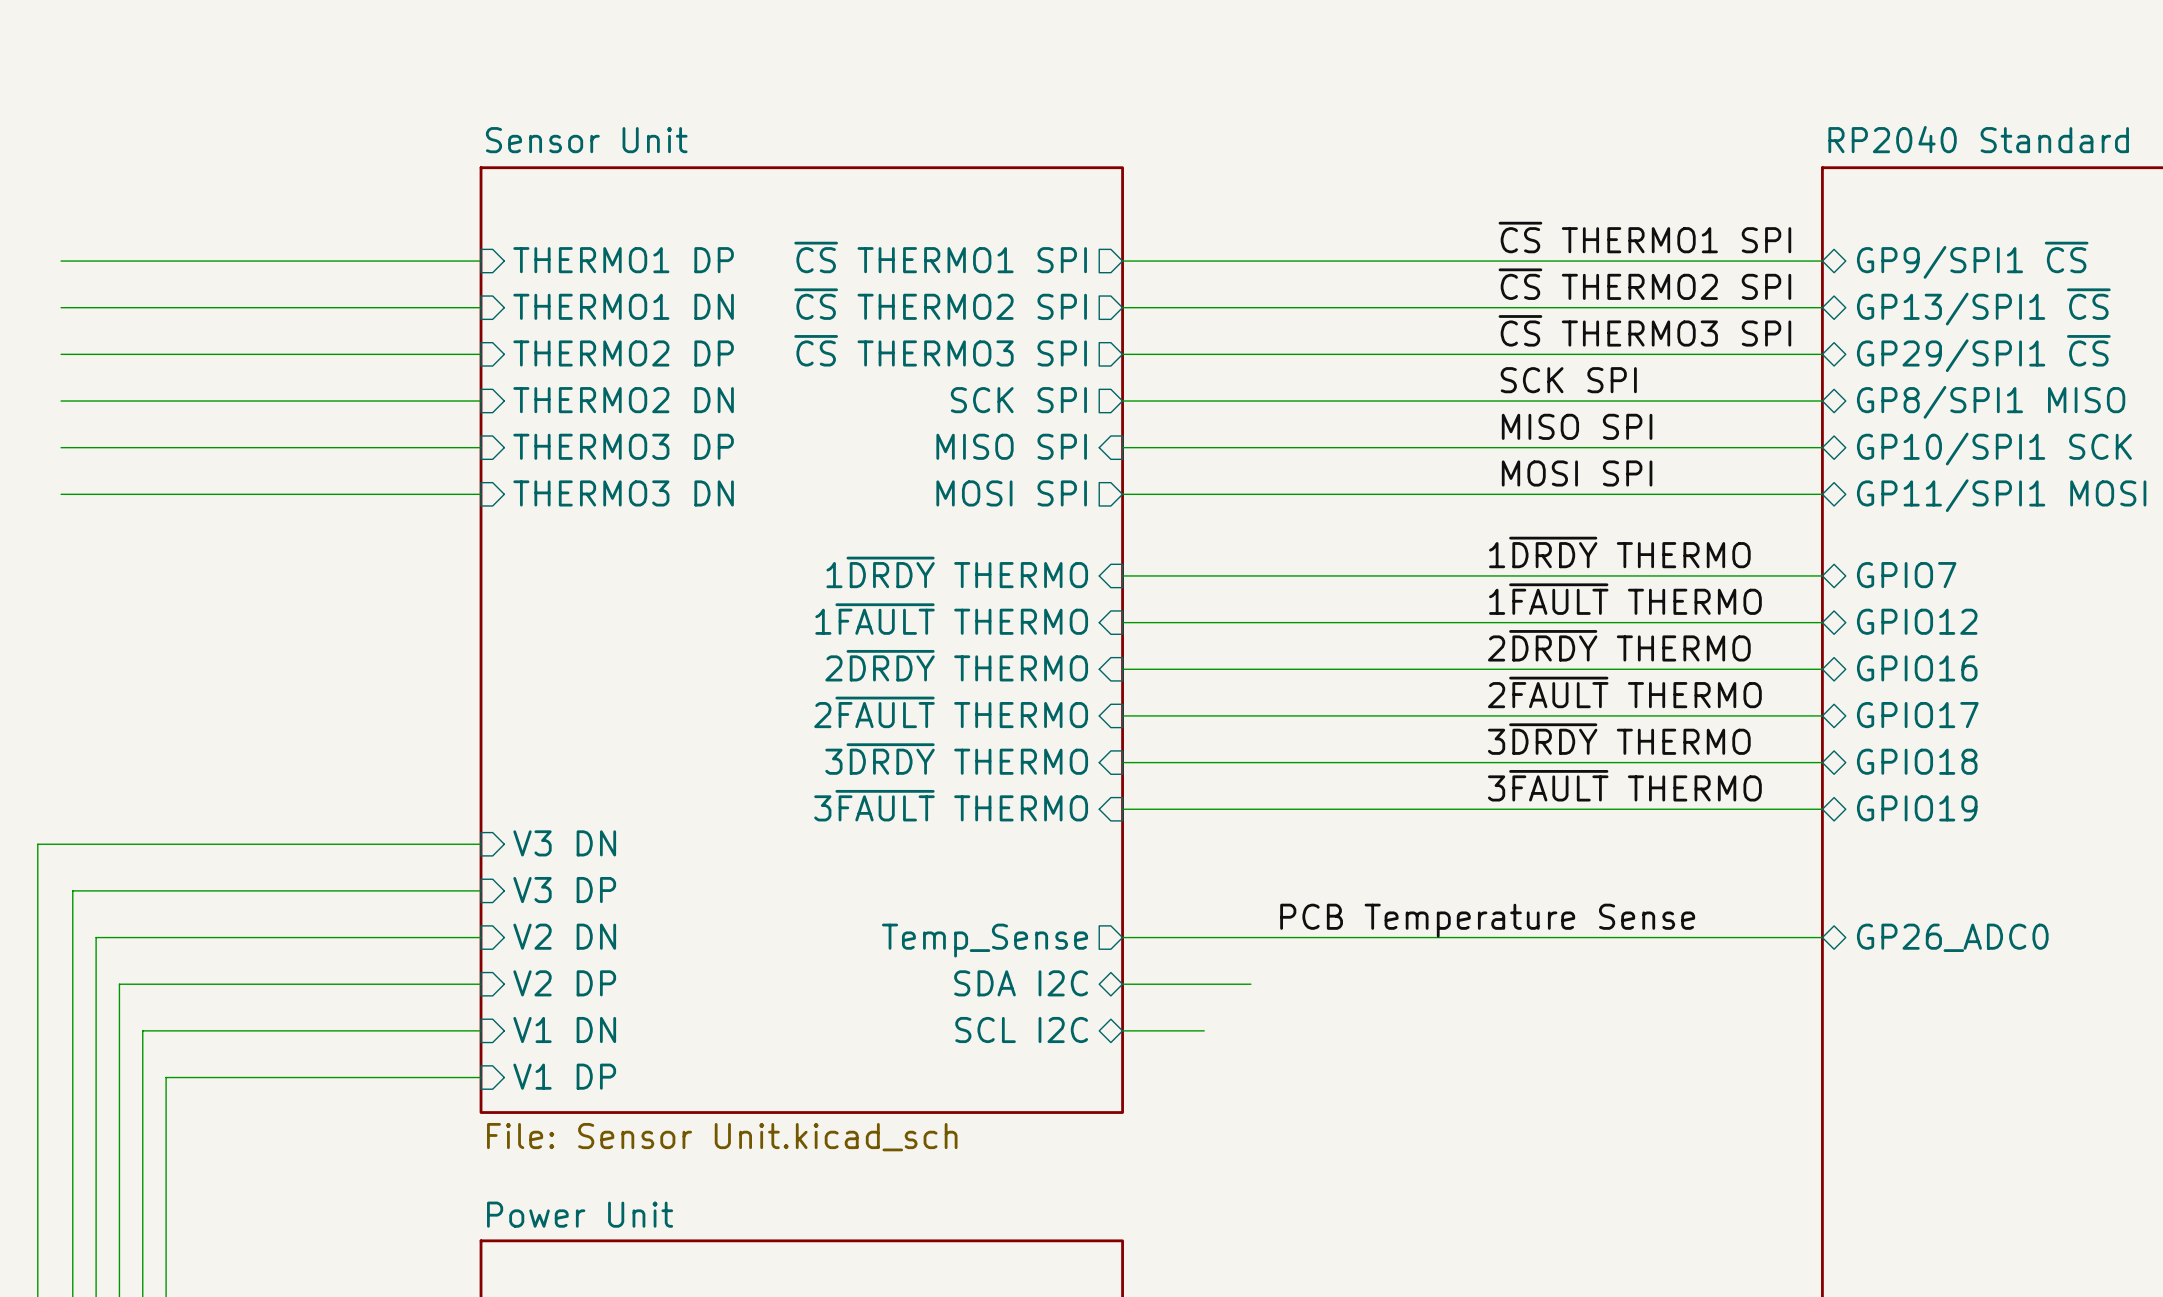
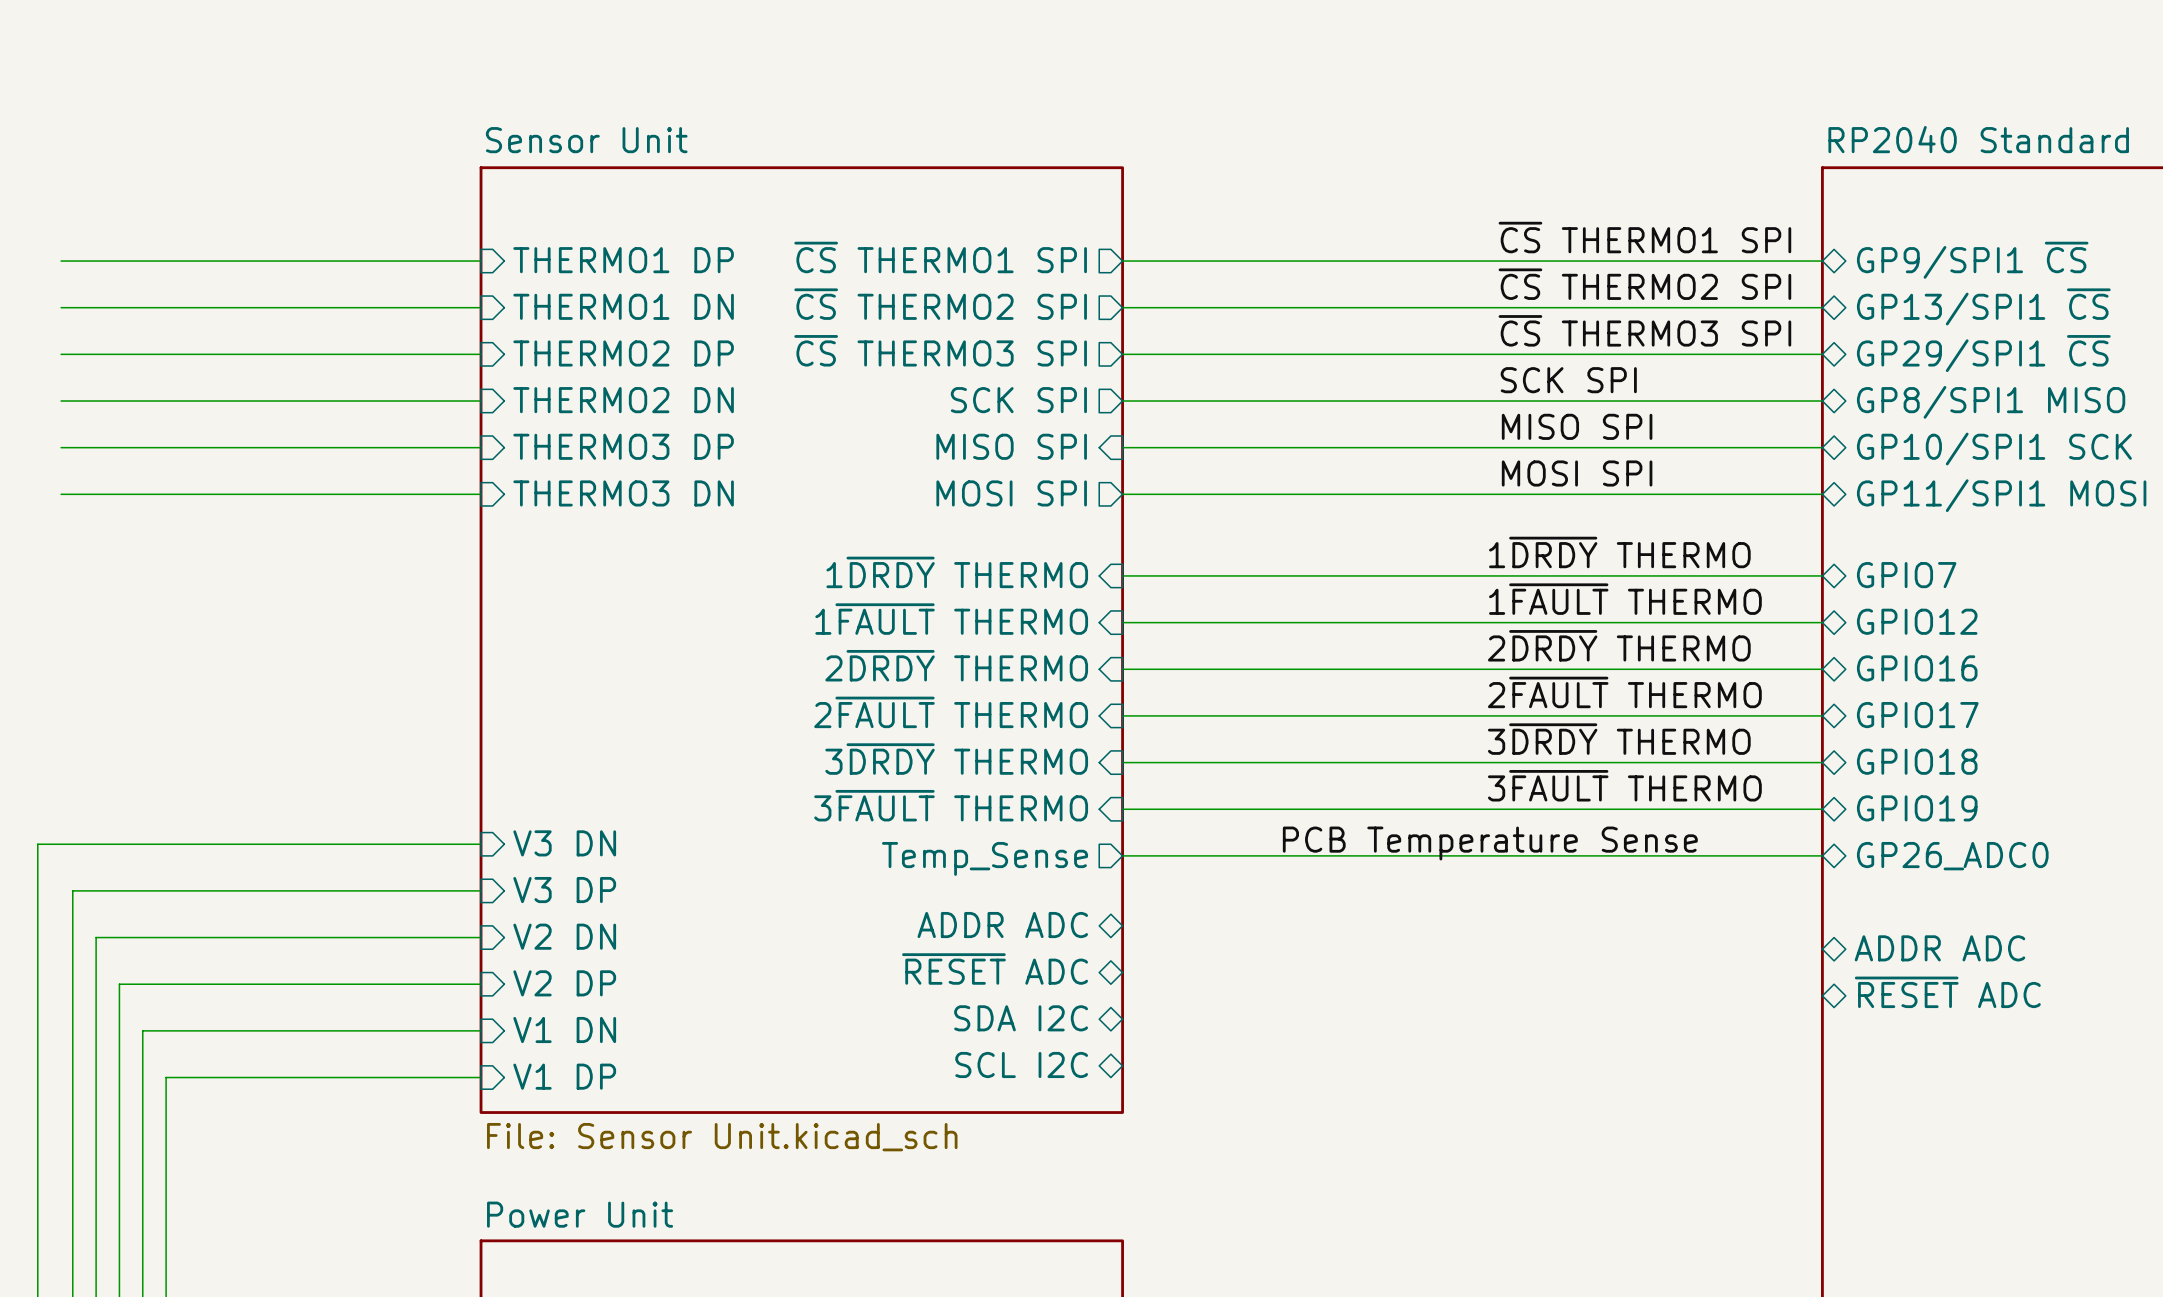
label position: PCB Temperature Sense (1487, 920) -> PCB Temperature Sense (1490, 843)
sheet pin: none -> ADDR ADC (1002, 925)
wire: (1122, 937) (1822, 937) -> (1122, 855) (1822, 855)
sheet pin position: GP26_ADC0 (1952, 937) -> GP26_ADC0 (1952, 856)
sheet pin position: Temp_Sense (985, 940) -> Temp_Sense (985, 858)
sheet pin: none -> ADDR ADC (1939, 948)
sheet pin: none -> ~{RESET} ADC (995, 969)
sheet pin position: SDA I2C (1021, 983) -> SDA I2C (1021, 1018)
wire: (1122, 984) (1250, 984) -> none
sheet pin: none -> ~{RESET} ADC (1947, 992)
sheet pin position: SCL I2C (1021, 1030) -> SCL I2C (1021, 1065)
wire: (1122, 1030) (1204, 1030) -> none

